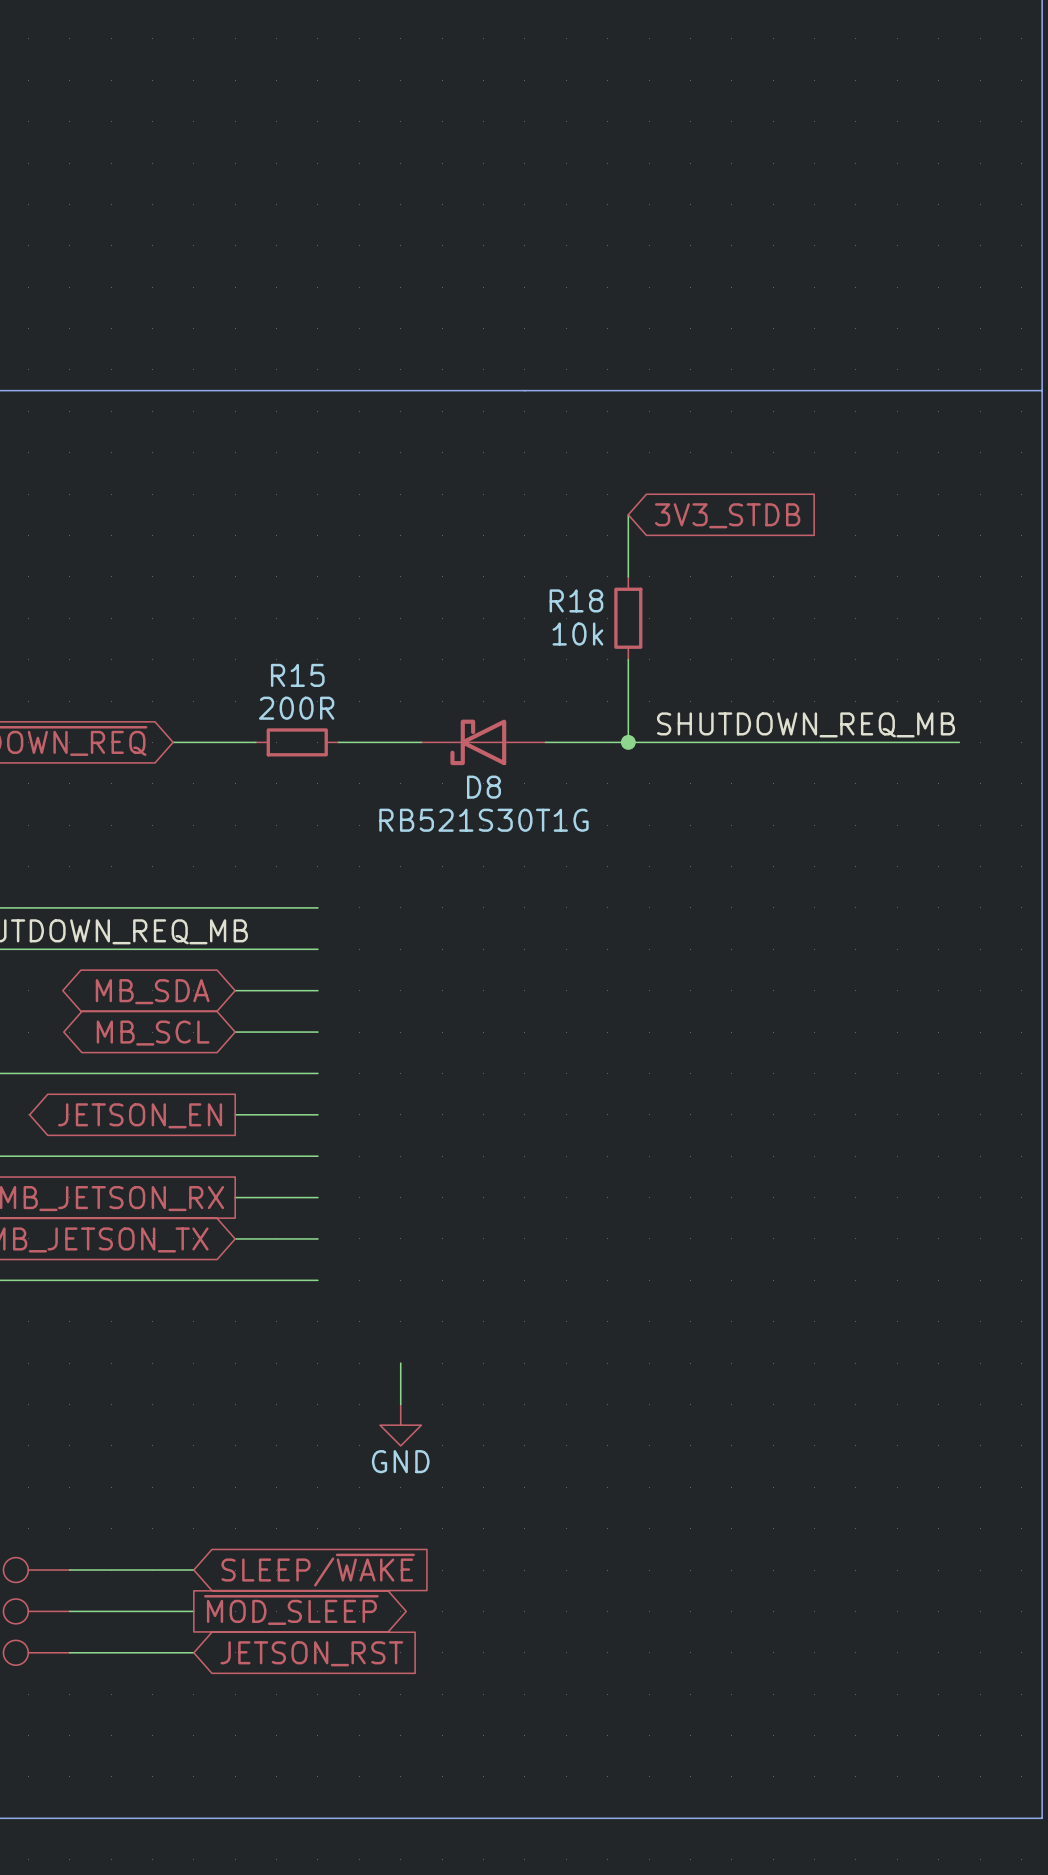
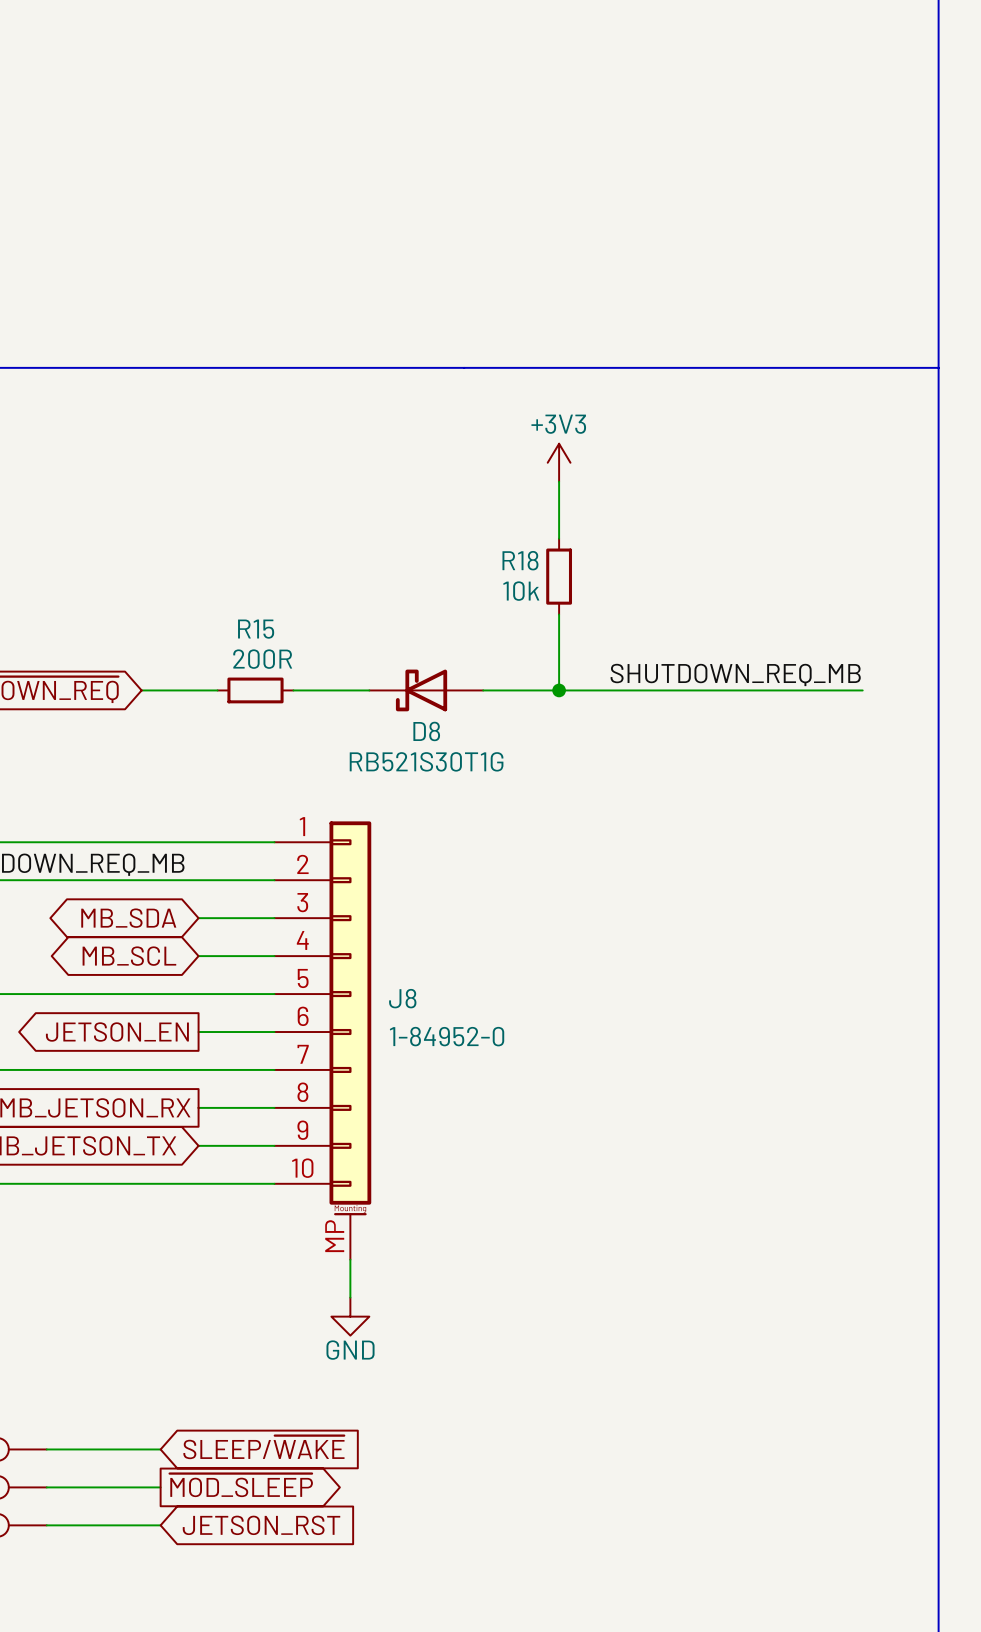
power symbol: none -> +3V3 (559, 462)
global label: 3V3_STDB (727, 515) -> none
J8: none -> 1-84952-0 (322, 1040)

